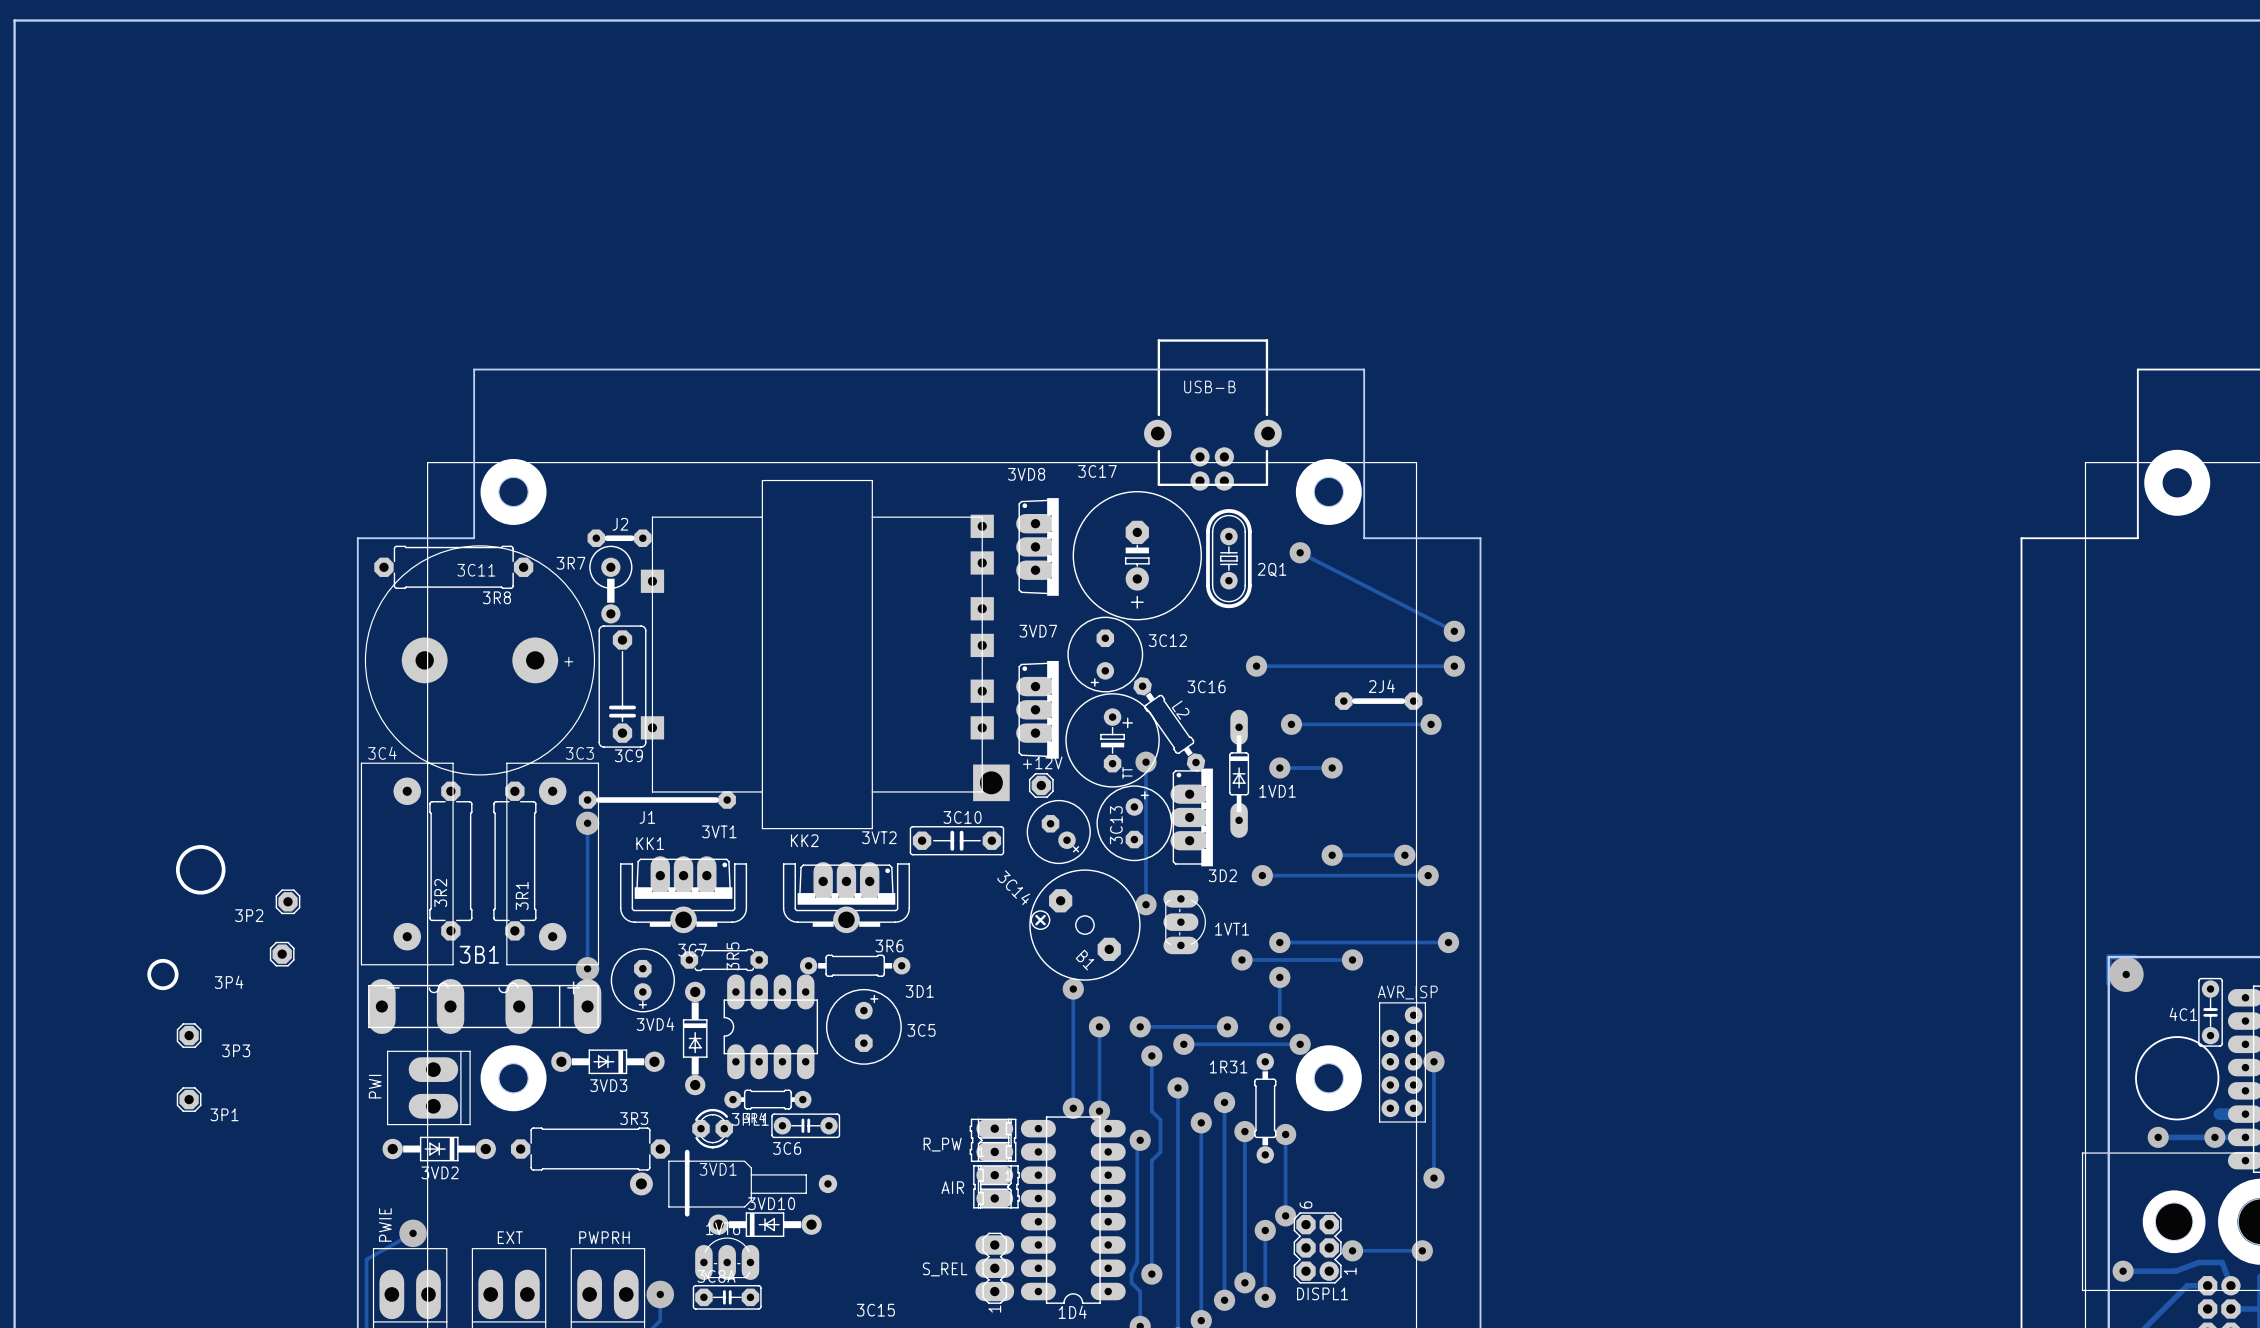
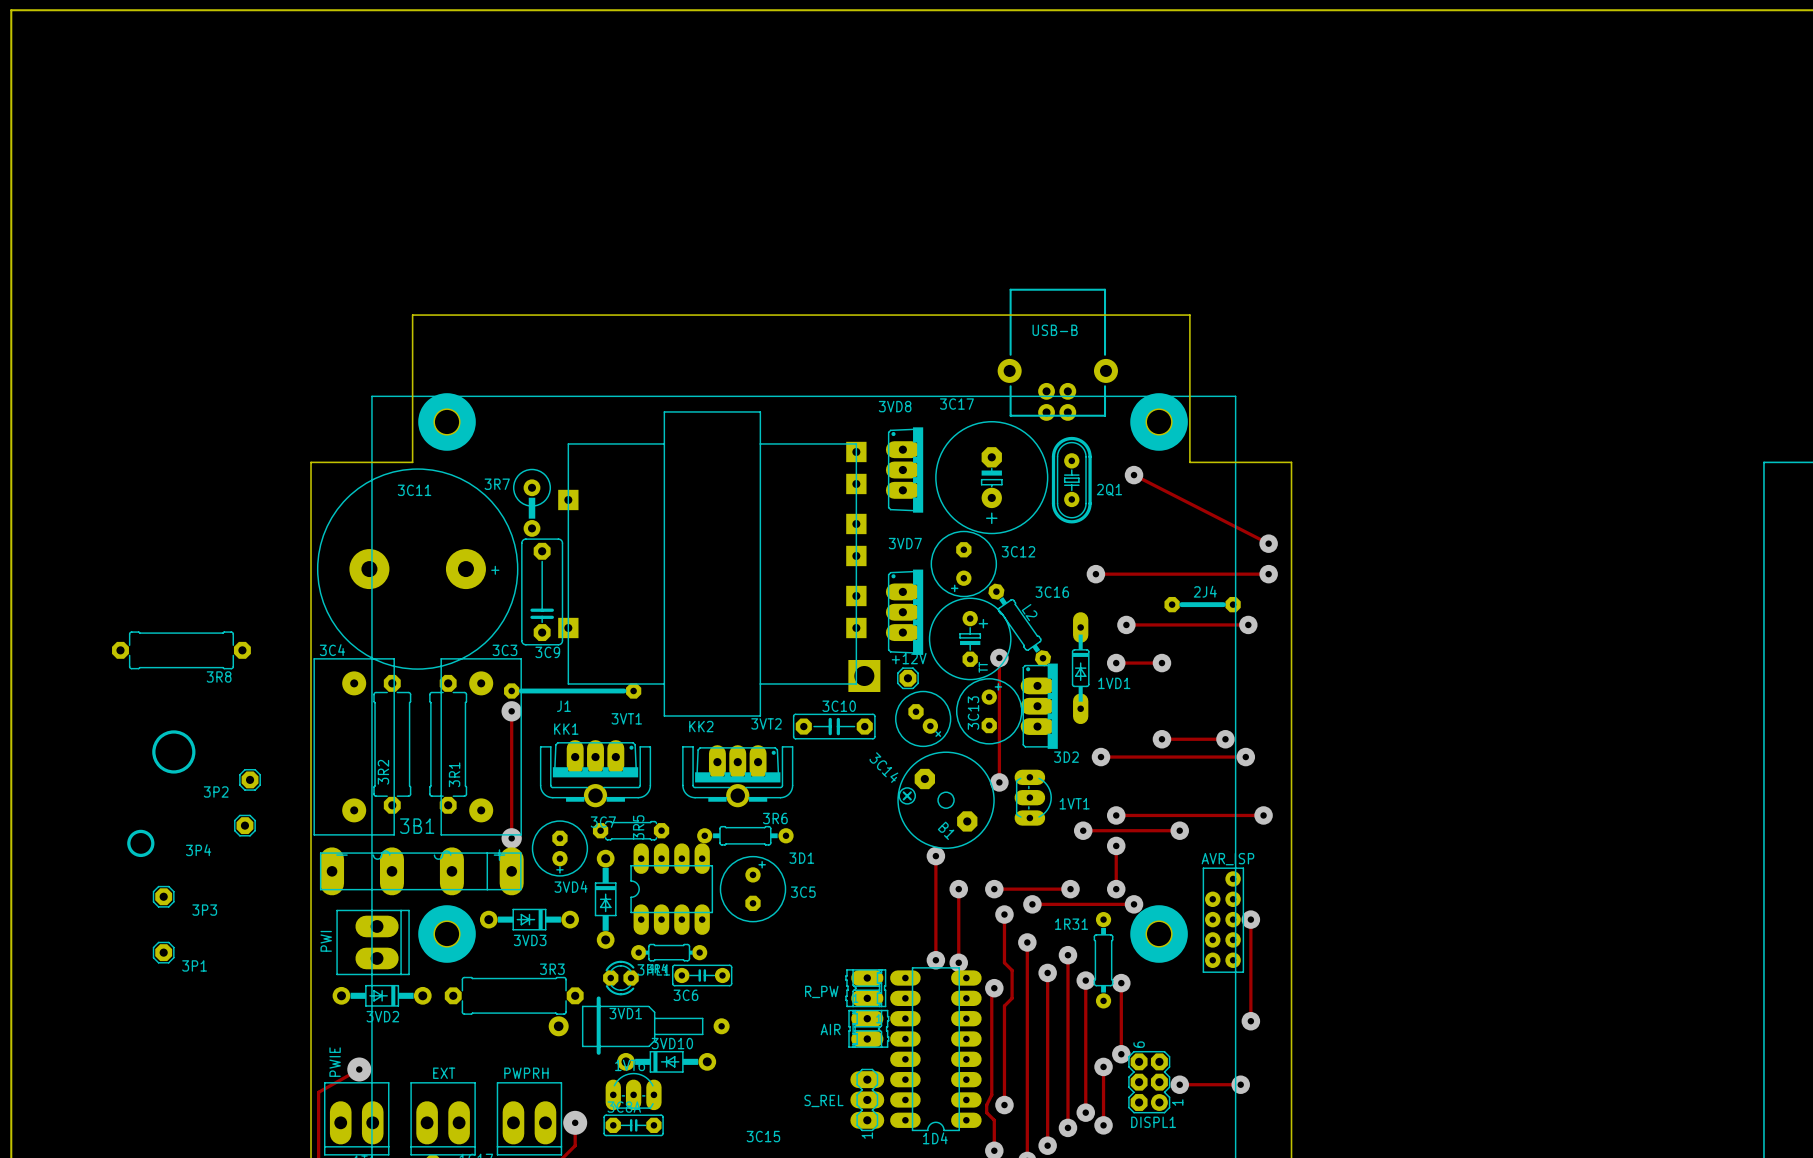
J2: (619, 538) -> none
3R8 position: (453, 567) -> (181, 650)

